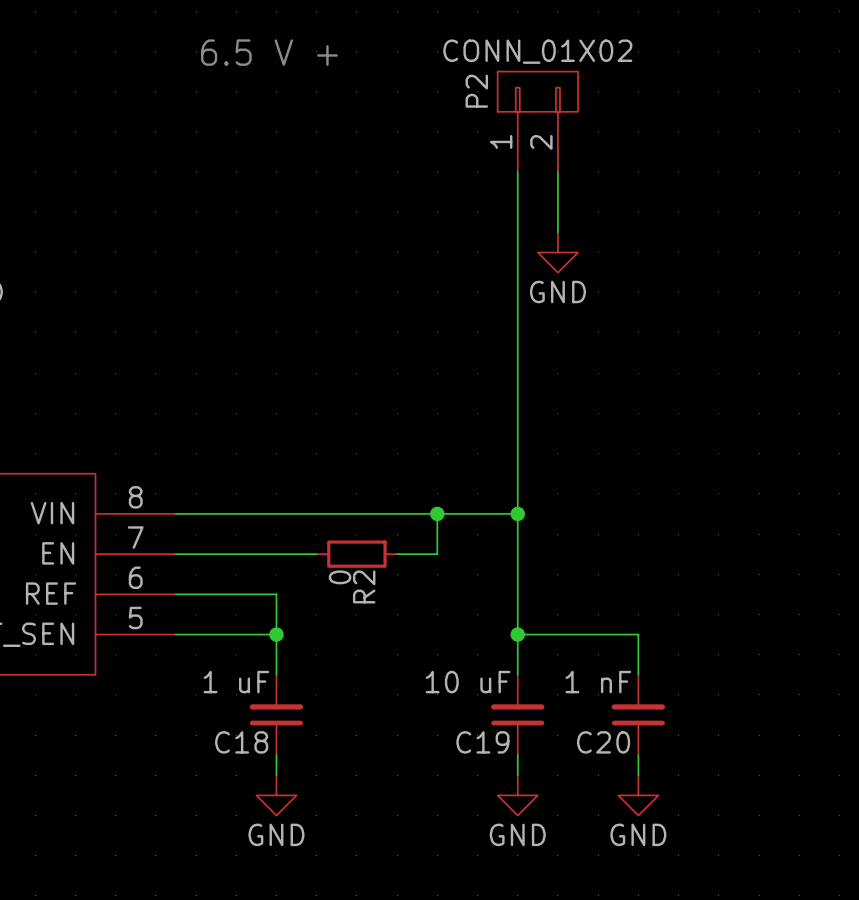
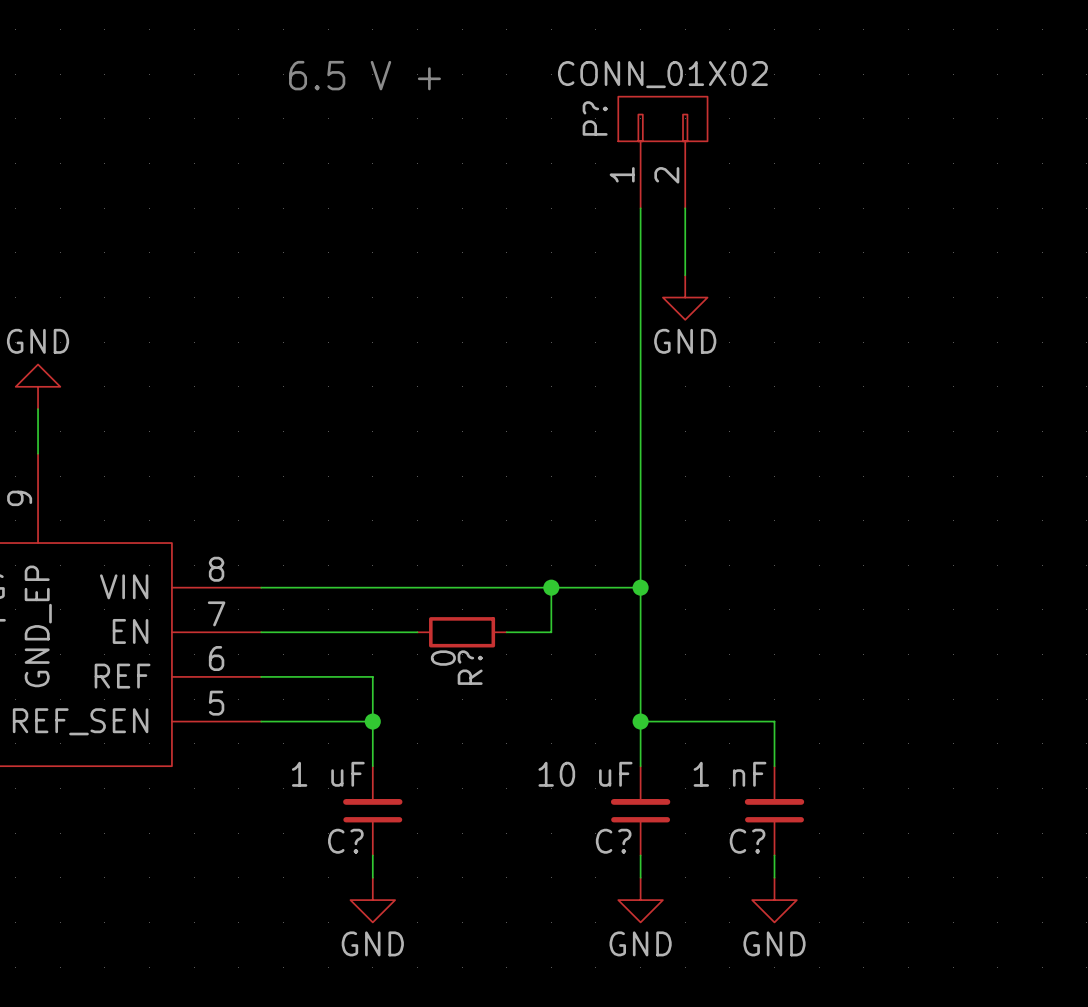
P2 name: P2 (476, 91) -> P? (595, 118)
R2 name: R2 (364, 586) -> R? (470, 667)
C18 name: C18 (241, 742) -> C? (345, 841)
C19 name: C19 (482, 742) -> C? (613, 841)
C20 name: C20 (603, 742) -> C? (747, 841)

